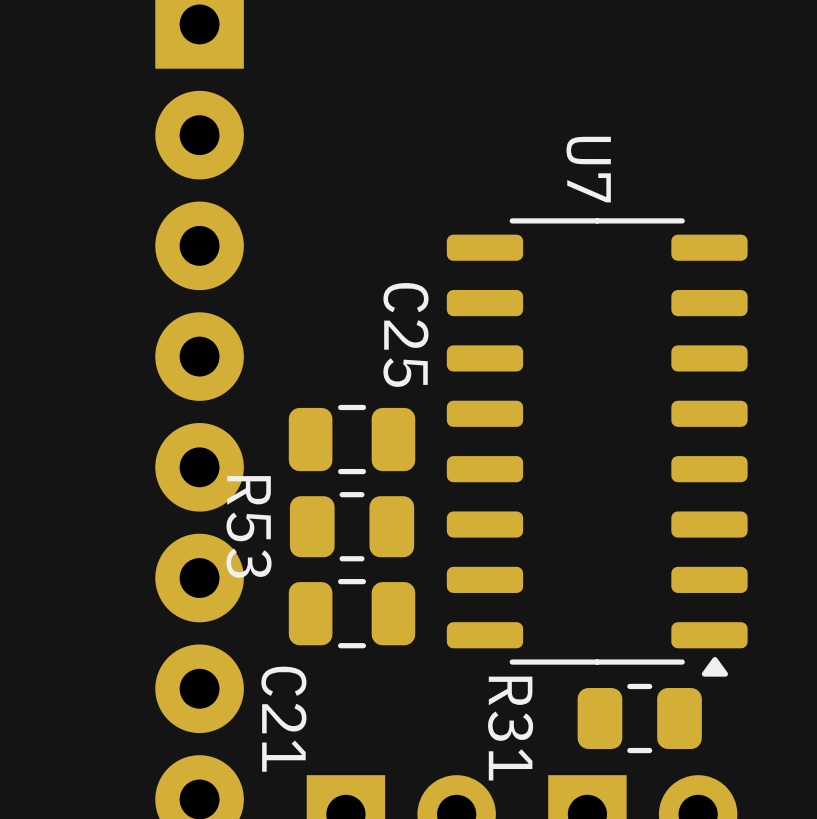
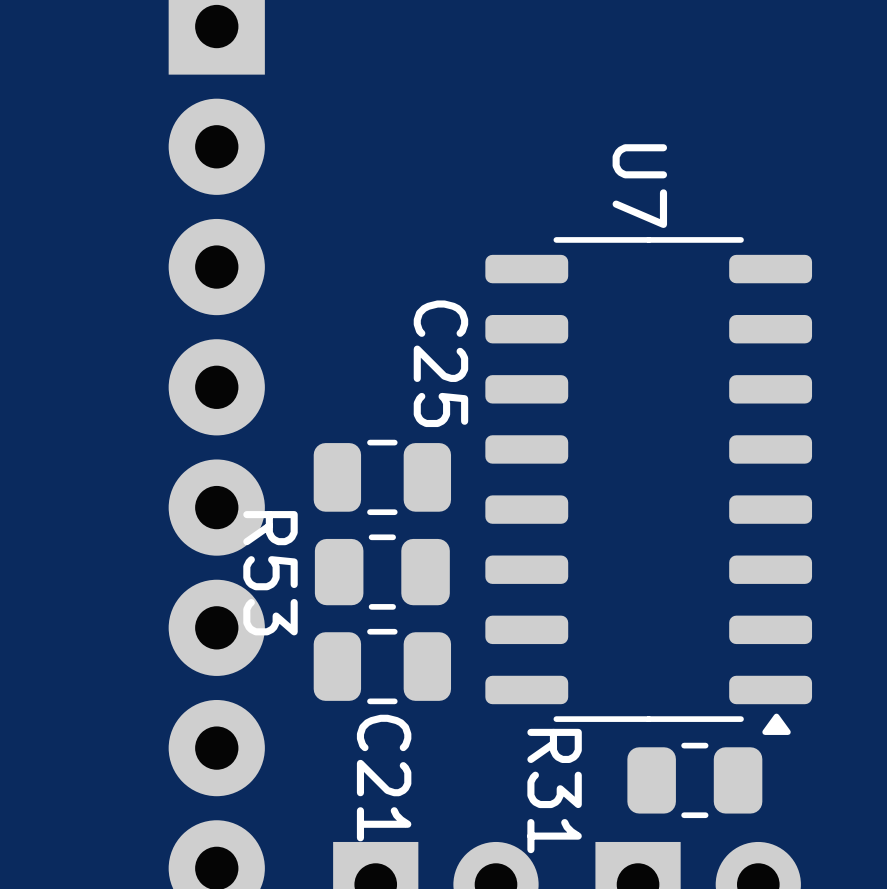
C21 name position: C21 (283, 719) -> C21 (384, 778)

